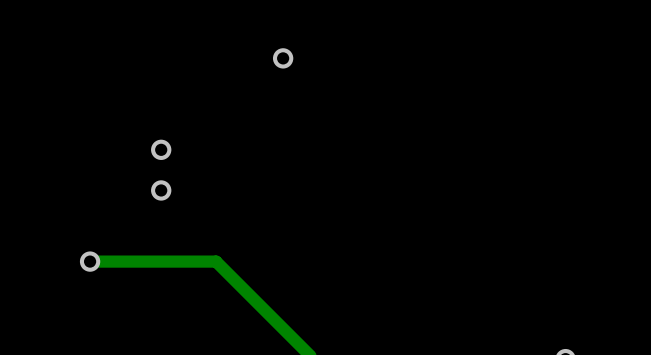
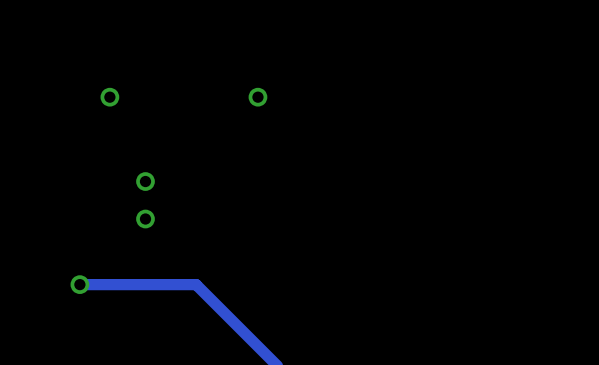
via: none -> (109, 97)

